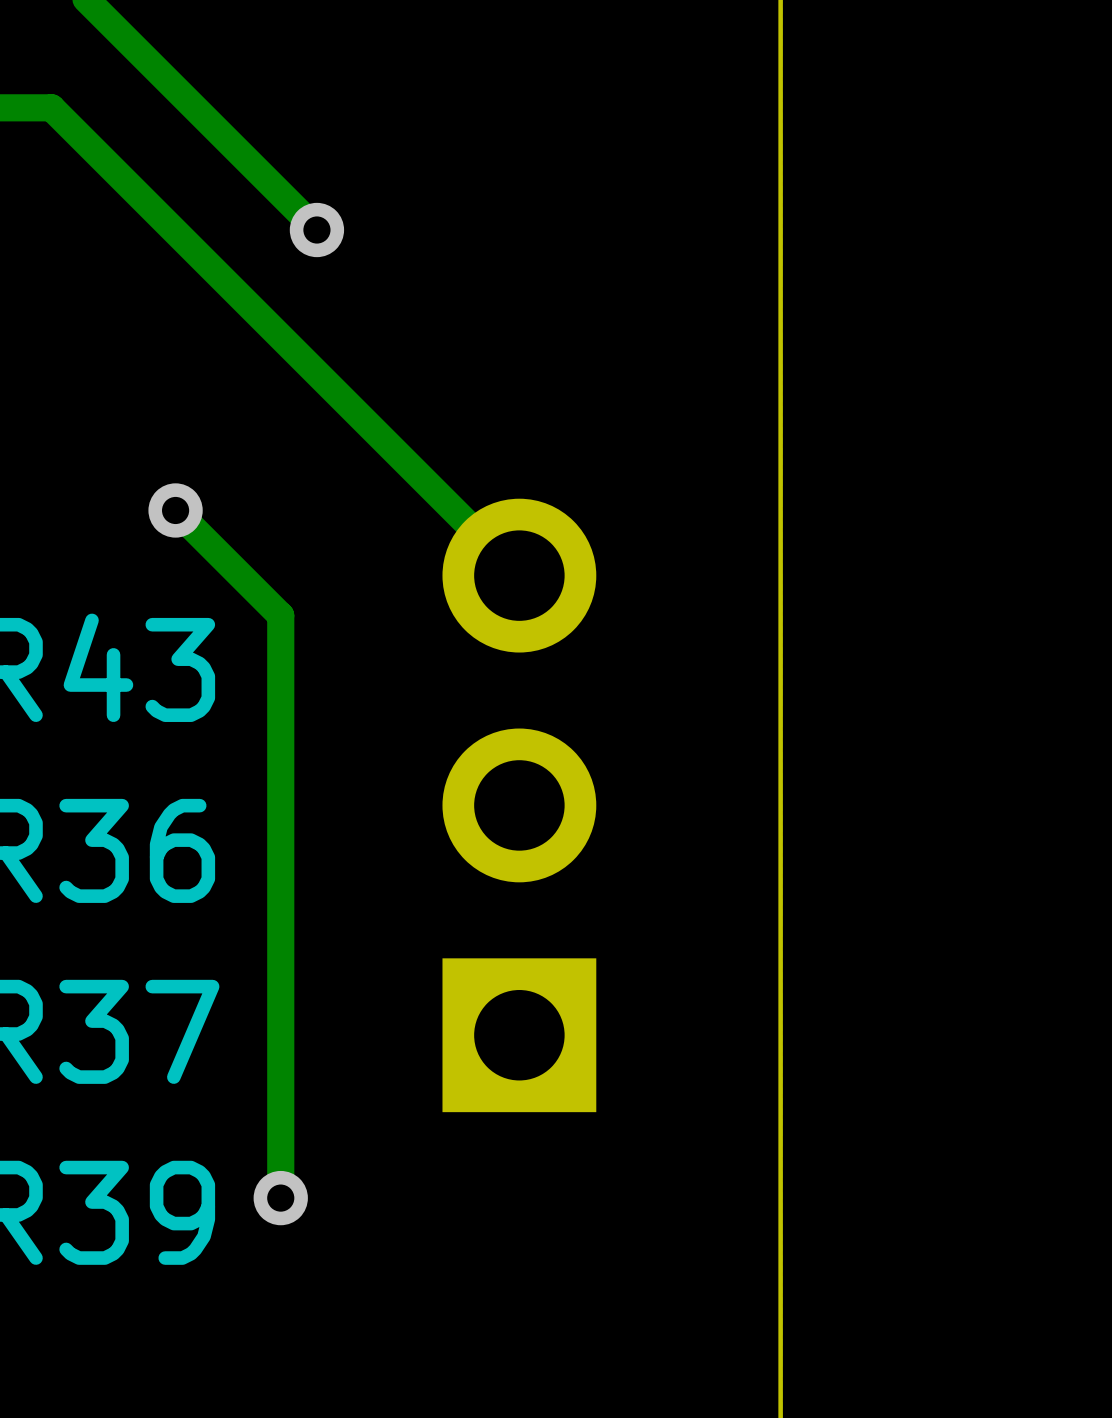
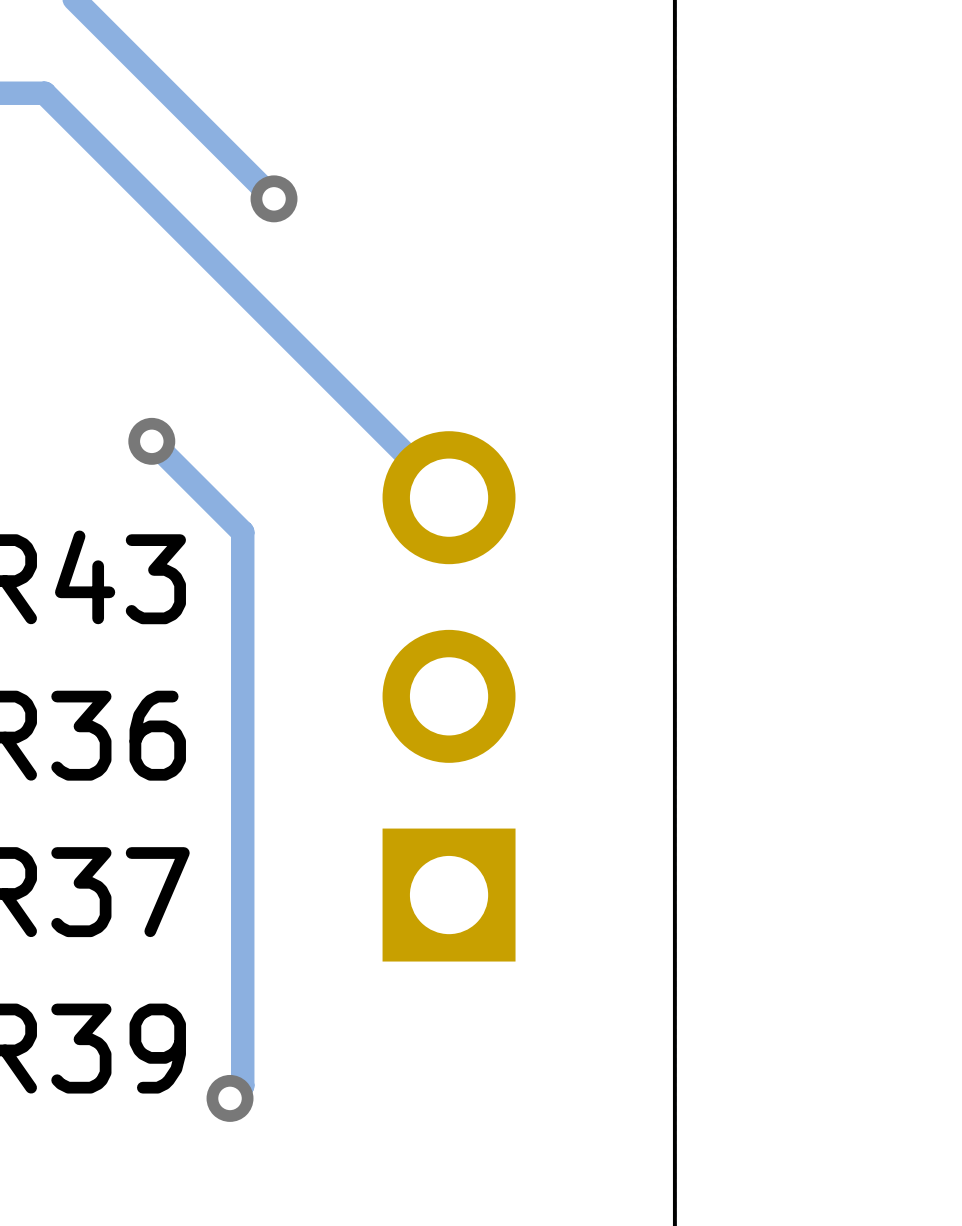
track: none -> (242, 1035) (242, 1085) (230, 1098)
via position: (280, 1198) -> (230, 1098)

